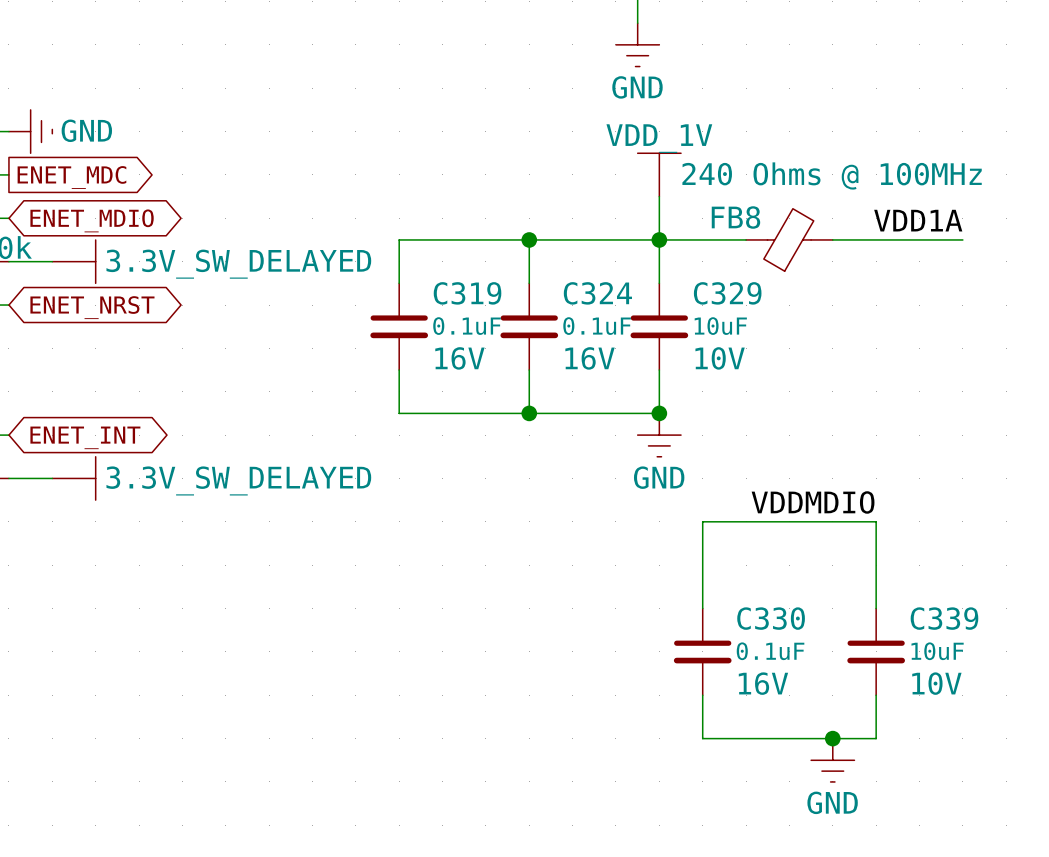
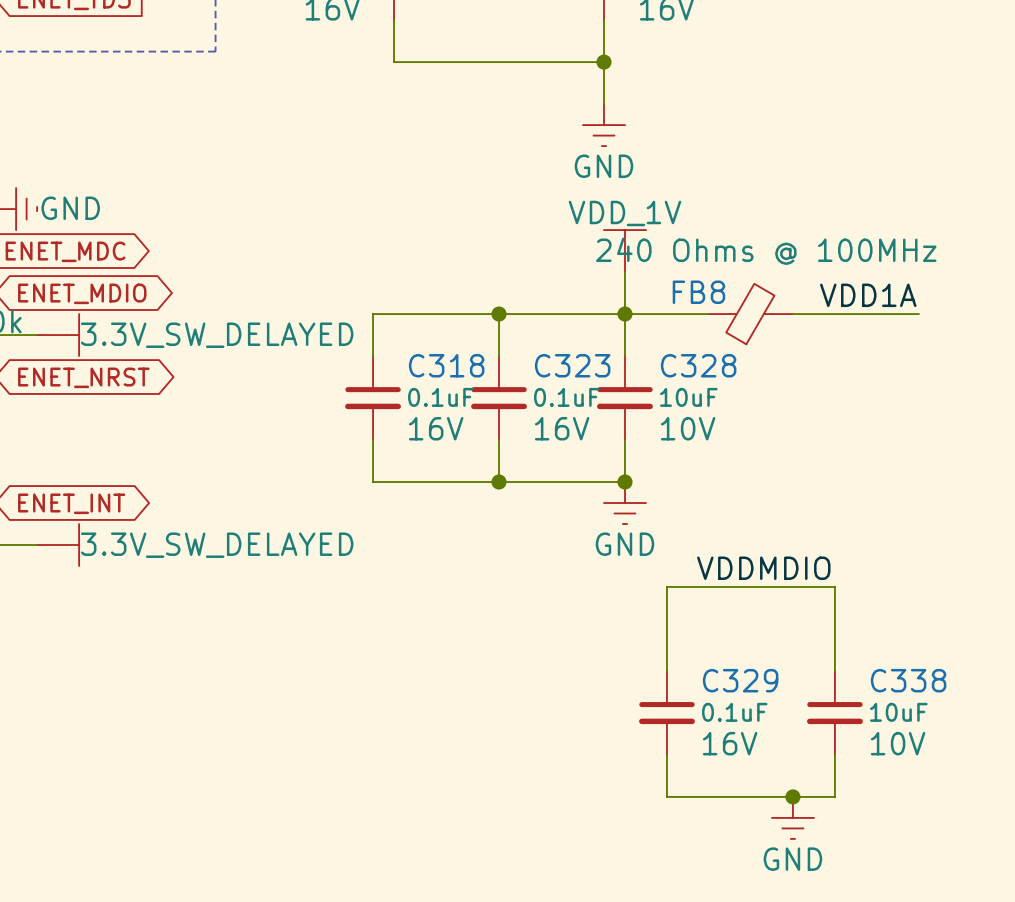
C319 name: C319 (467, 293) -> C318 (446, 365)
C324 name: C324 (597, 293) -> C323 (572, 365)
C329 name: C329 (727, 293) -> C328 (698, 365)
C330 name: C330 (771, 618) -> C329 (740, 680)
C339 name: C339 (944, 618) -> C338 (908, 680)

